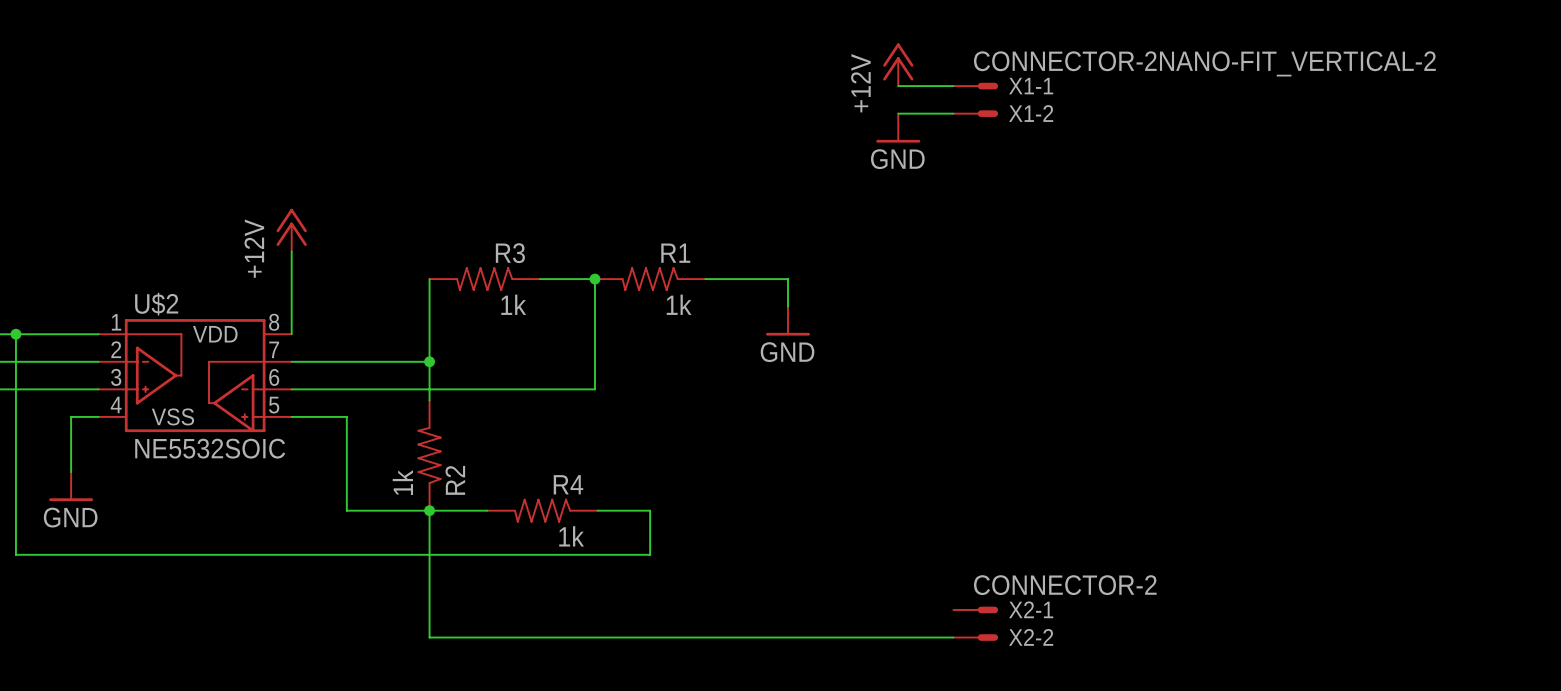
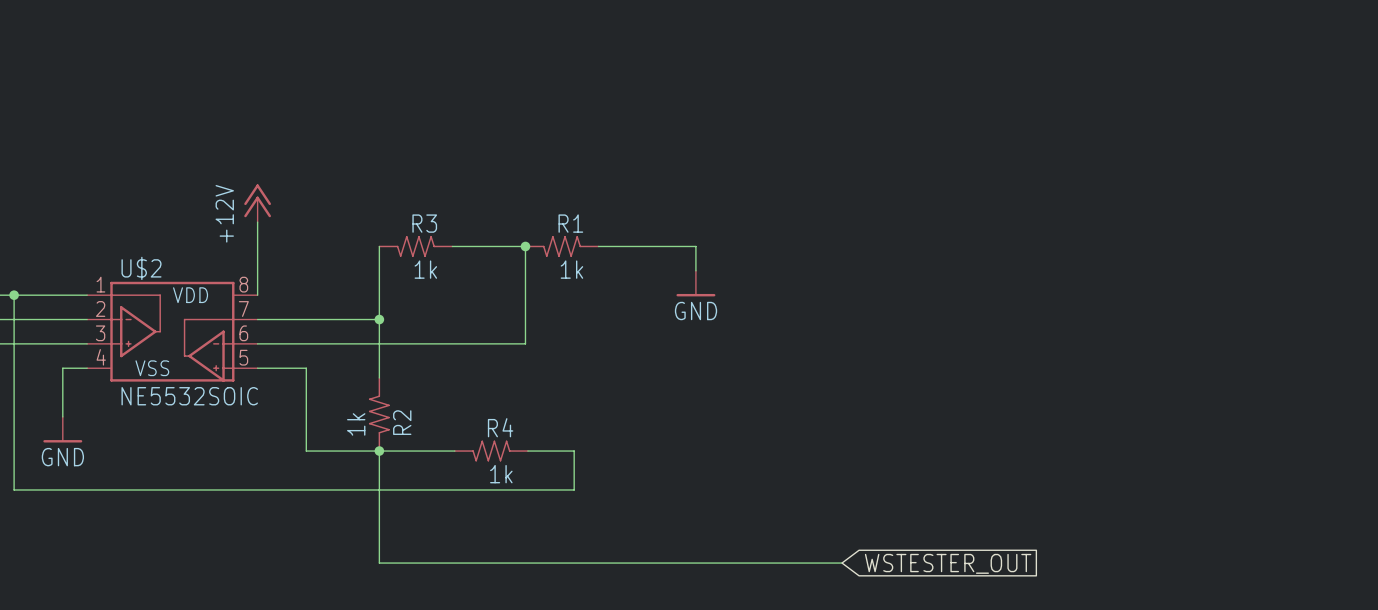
power symbol: +12V (898, 64) -> none
wire: (898, 86) (953, 86) -> none
X1-1: CONNECTOR-2NANO-FIT_VERTICAL-2 (975, 86) -> none
wire: (898, 113) (953, 113) -> none
X1-2: (975, 113) -> none
power symbol: GND (898, 128) -> none
R3 symbol: [429, 267, 540, 291] -> [378, 236, 454, 257]
R1 symbol: [594, 267, 706, 291] -> [524, 236, 600, 257]
R2 symbol: [417, 400, 442, 511] -> [368, 377, 390, 452]
R4 symbol: [487, 498, 598, 523] -> [454, 440, 529, 462]
X2-1: CONNECTOR-2 (975, 609) -> none
X2-2: (975, 637) -> none
global label: none -> WSTESTER_OUT (948, 563)

